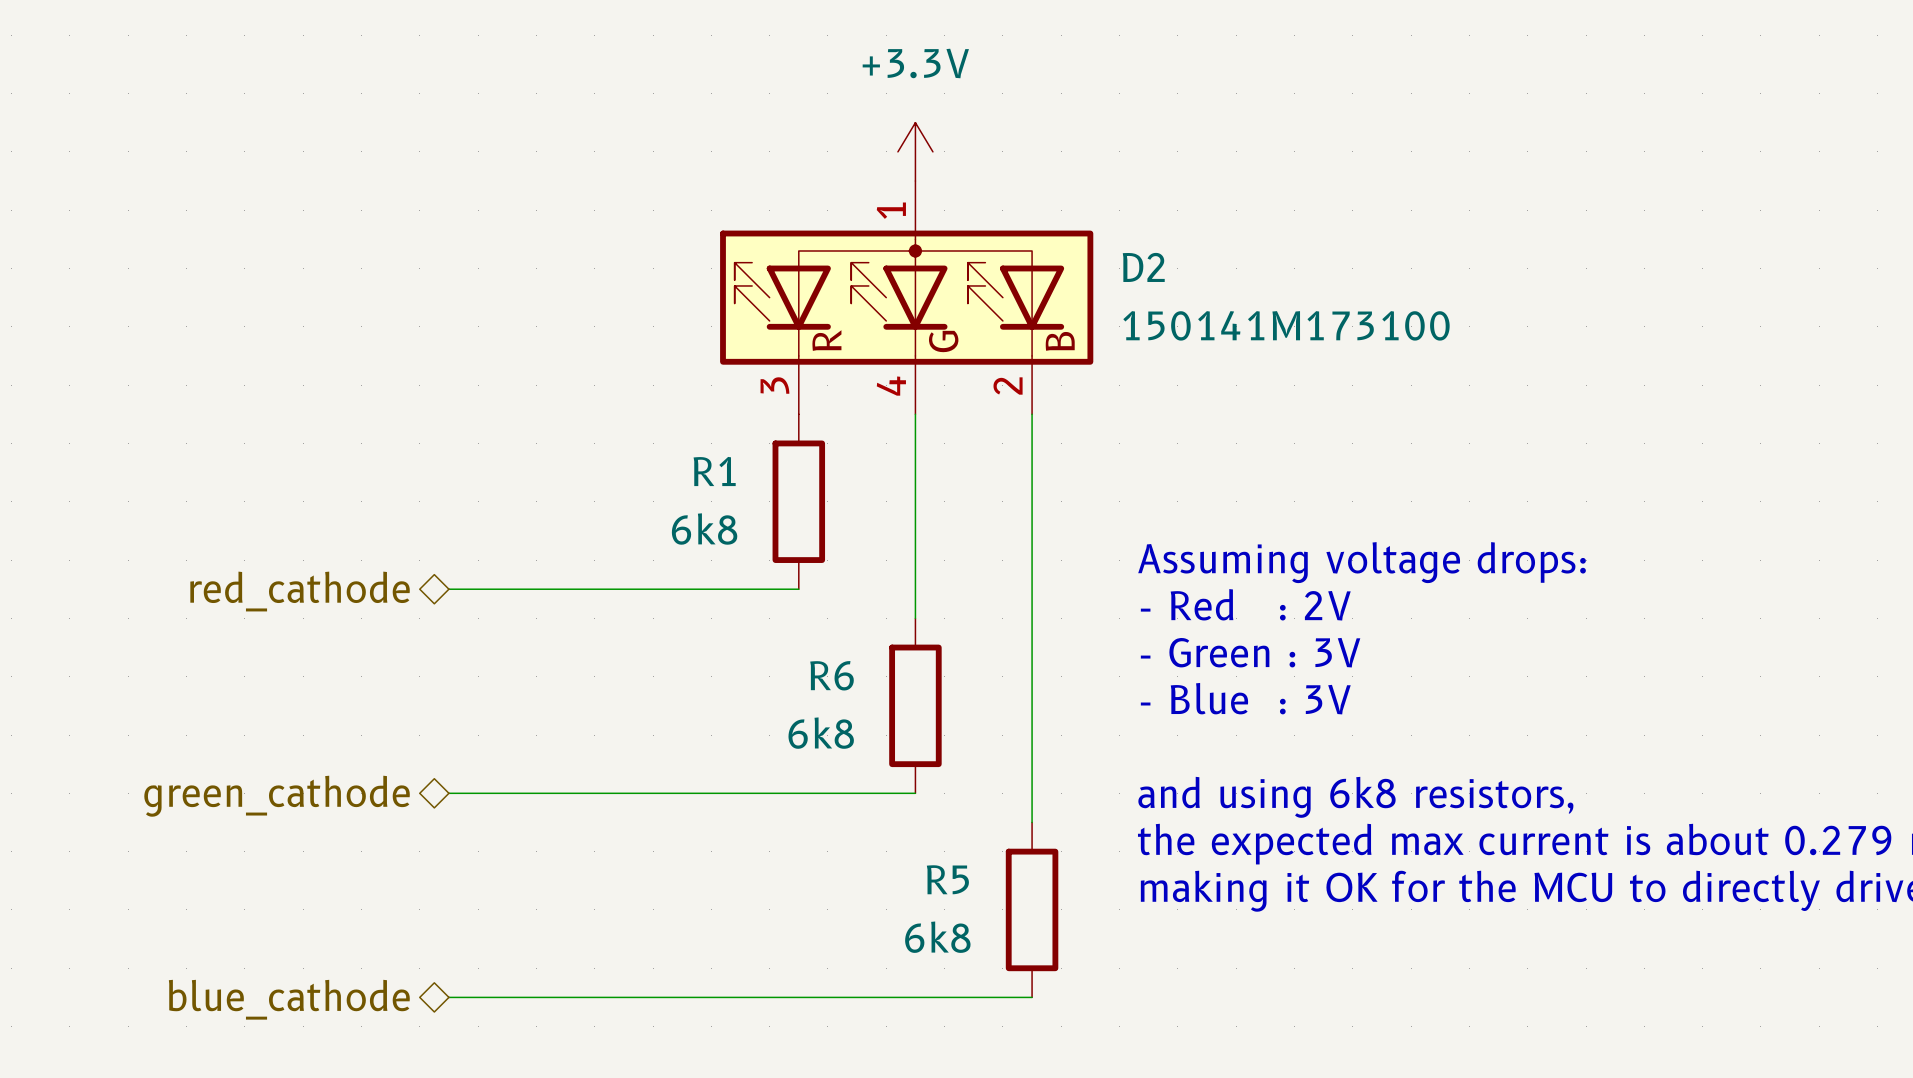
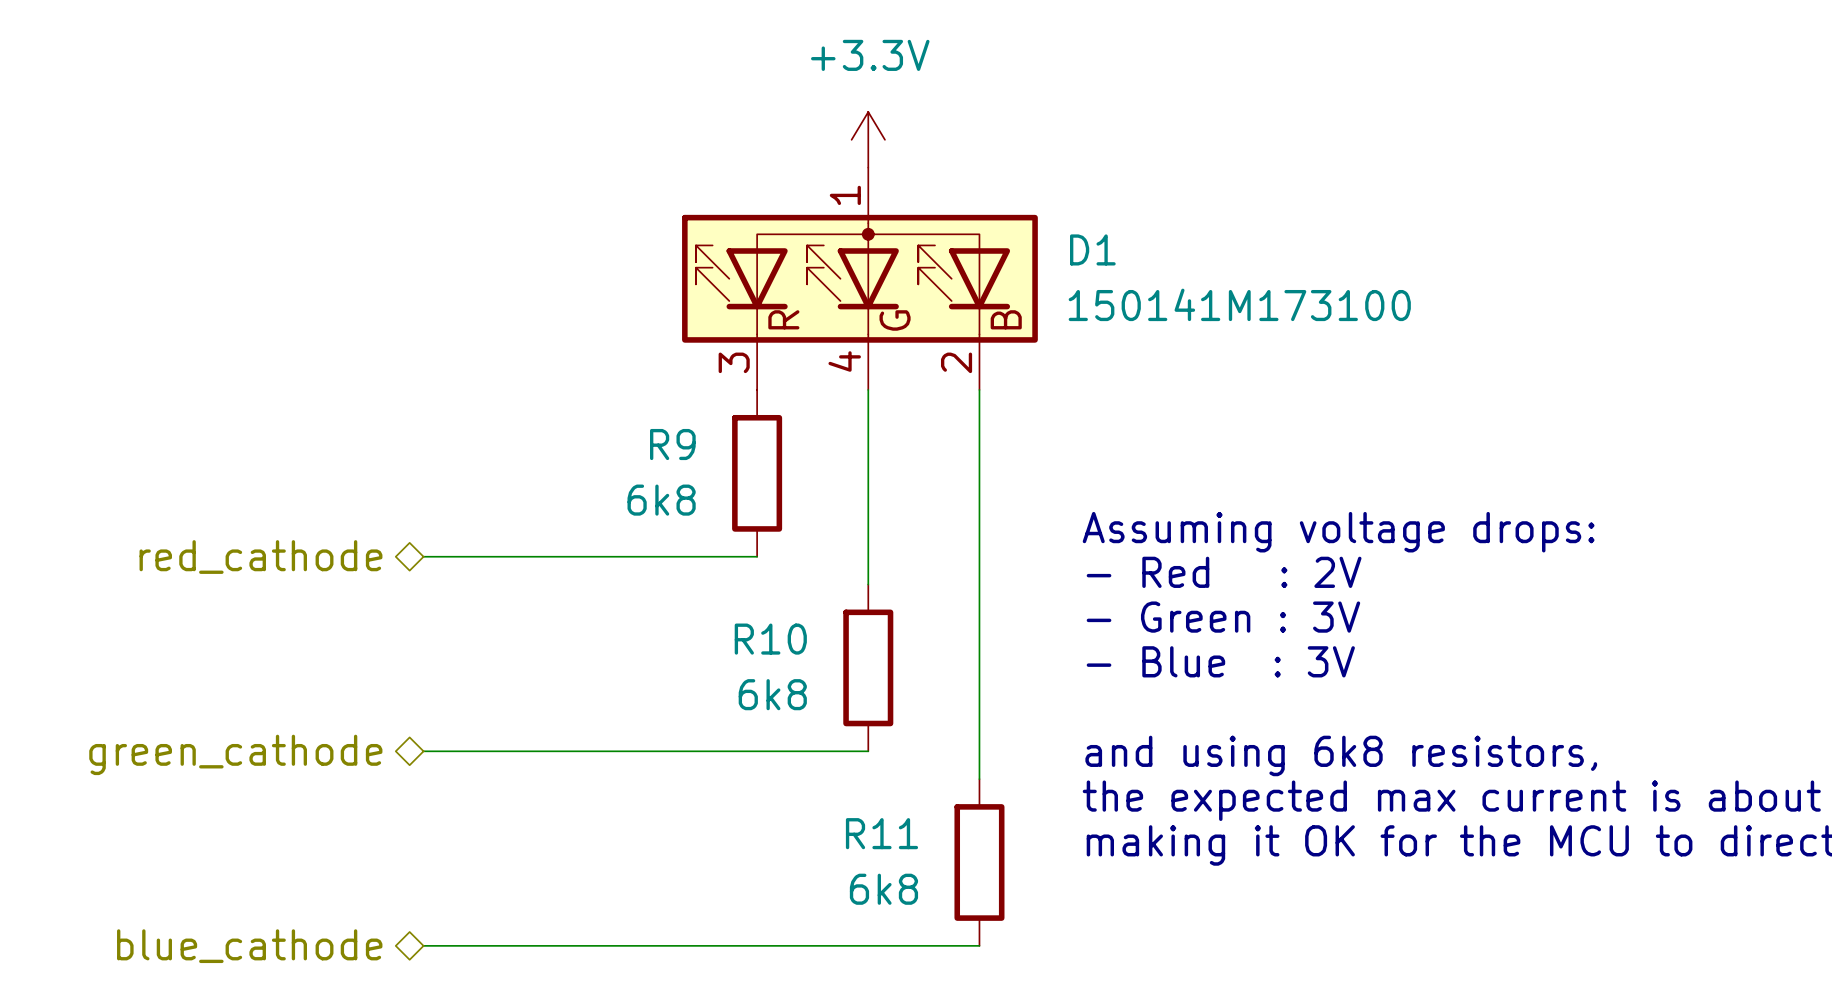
D2 name: D2 (1143, 267) -> D1 (1092, 249)
R1 name: R1 (714, 471) -> R9 (672, 444)
R6 name: R6 (832, 675) -> R10 (770, 639)
R5 name: R5 (947, 879) -> R11 (881, 833)

